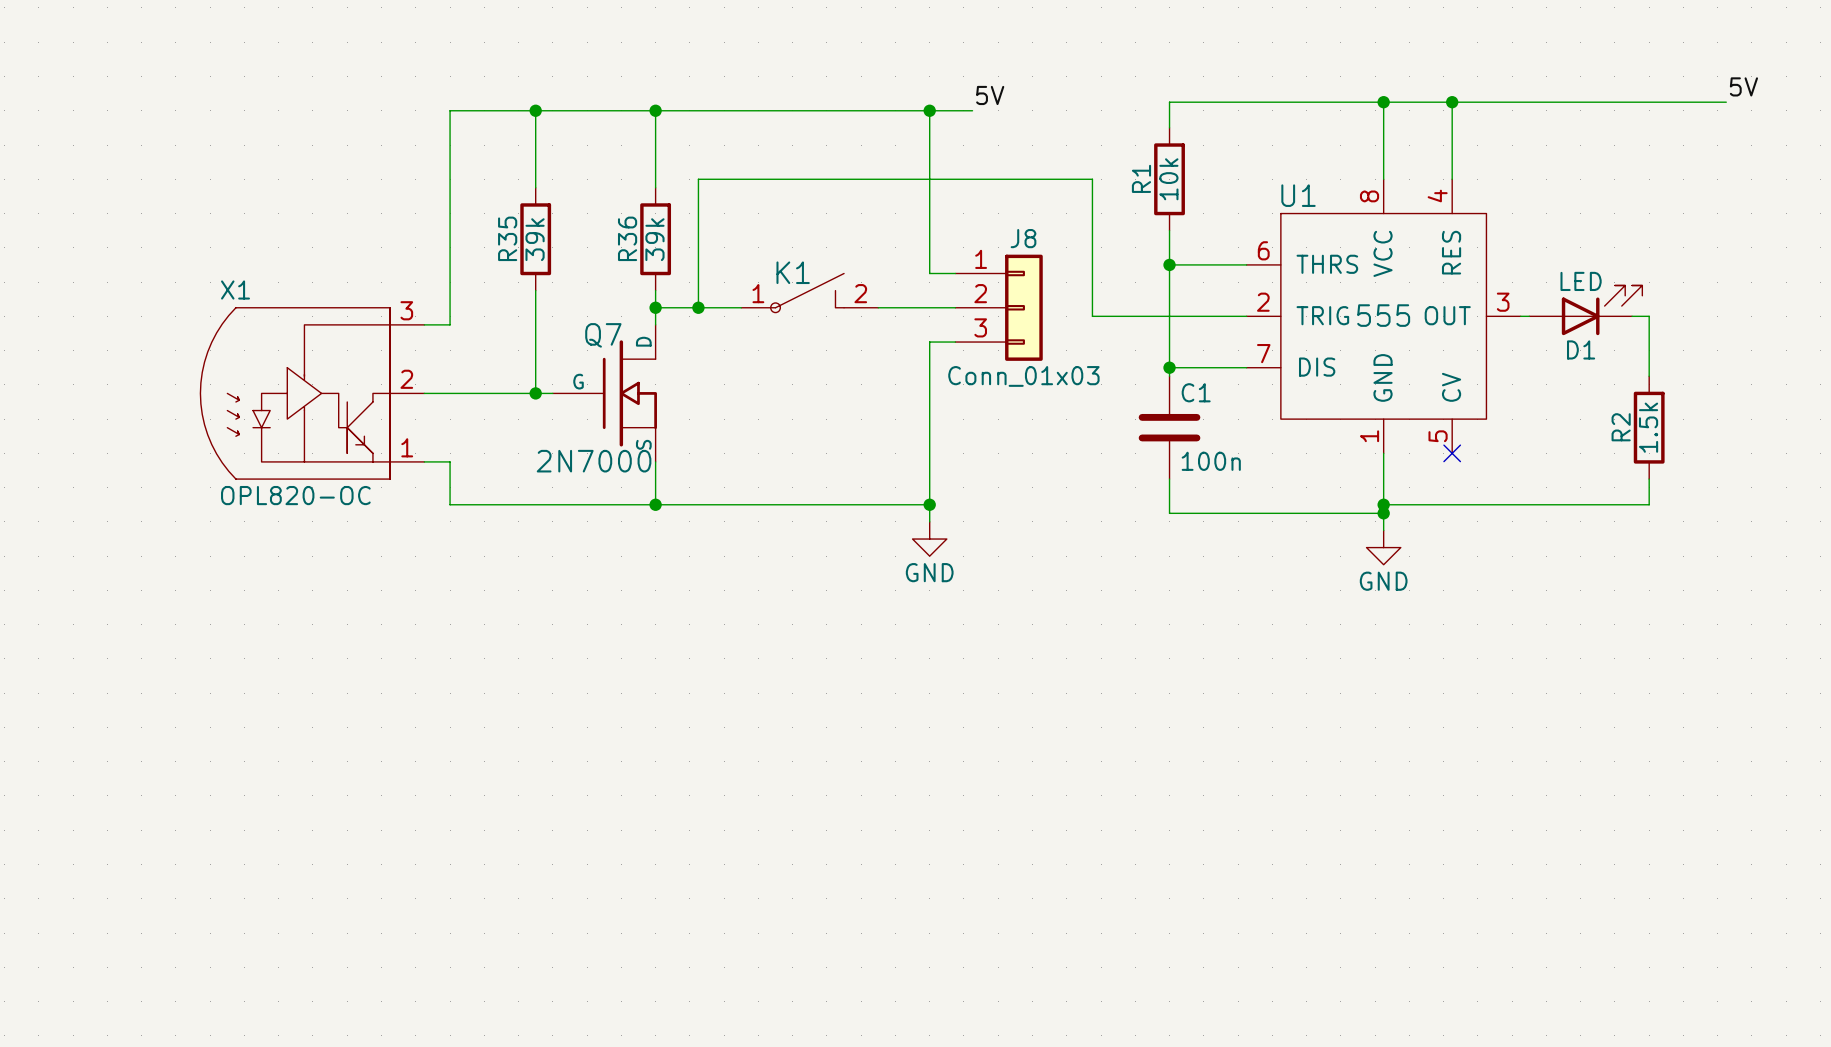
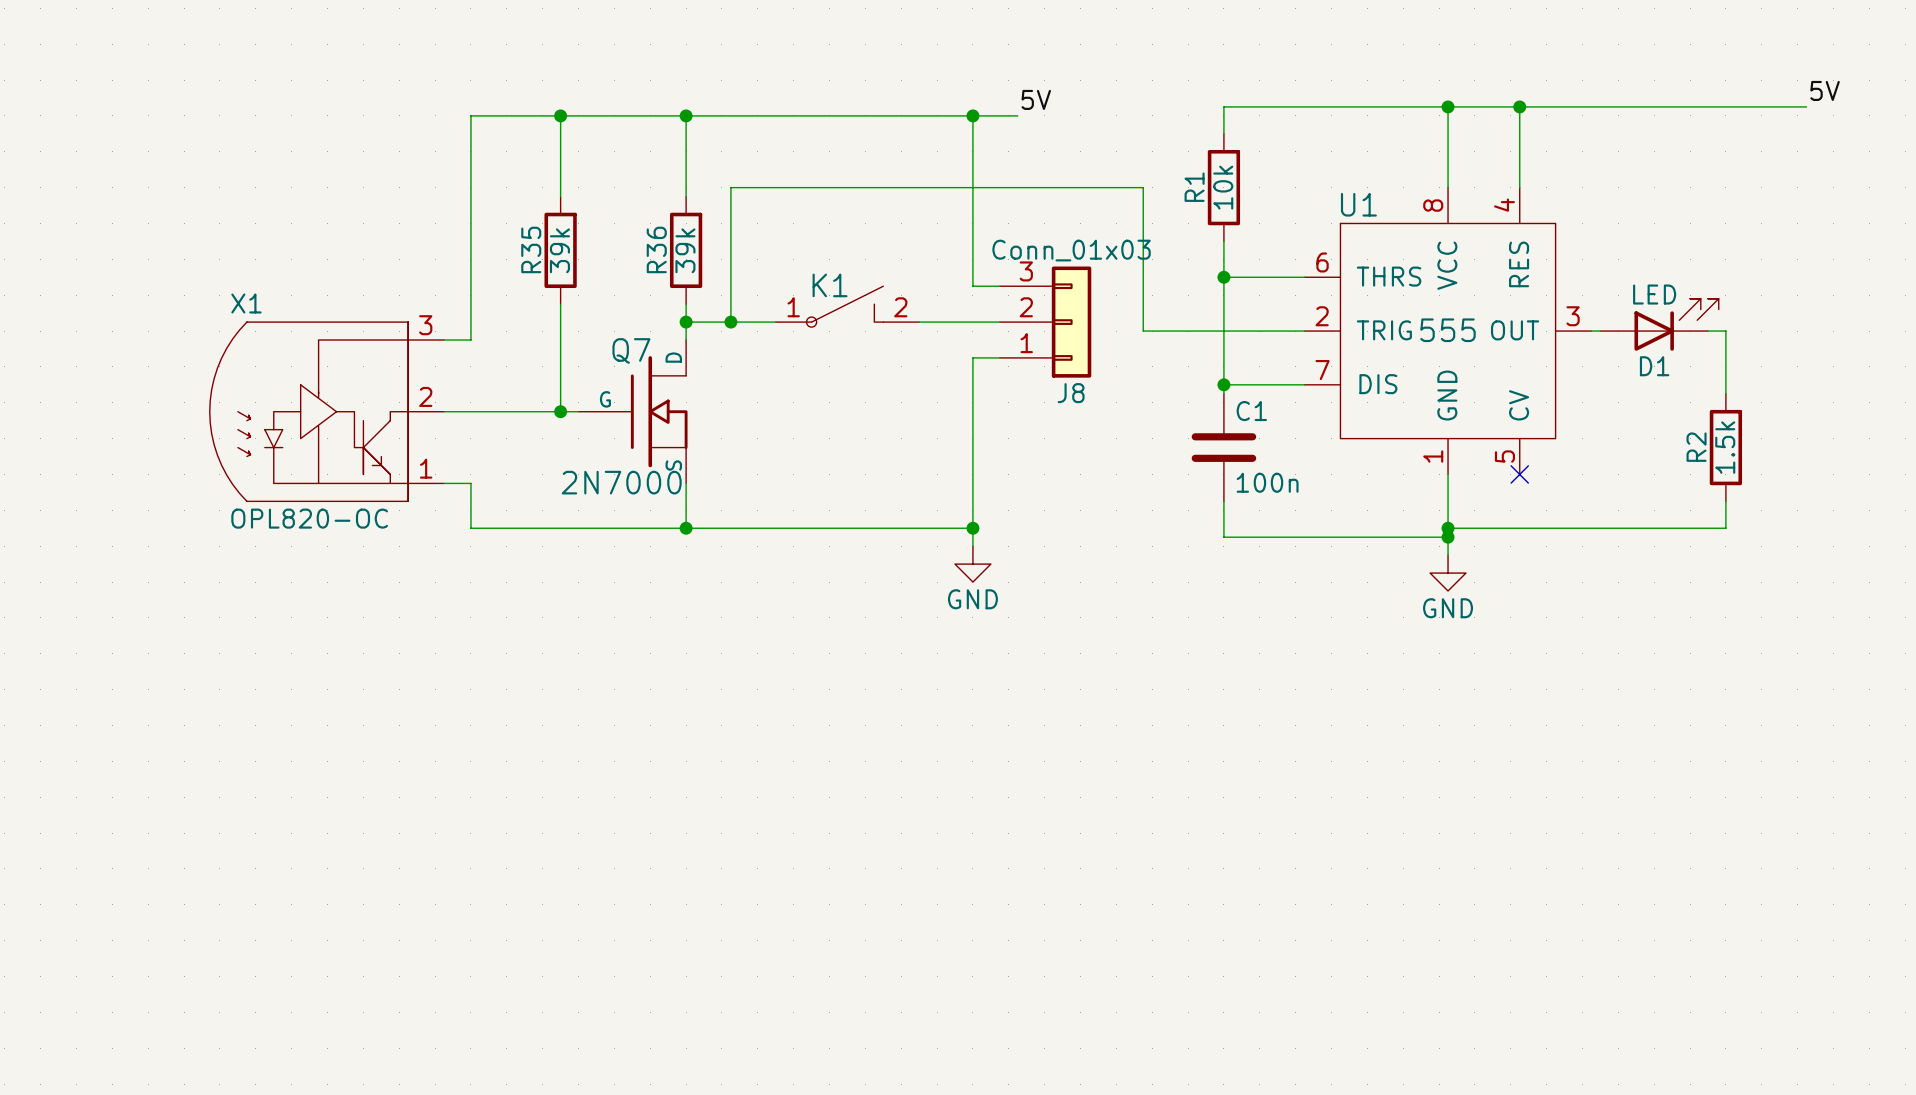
J8 flip: as is (1023, 307) -> up-down (1071, 322)

